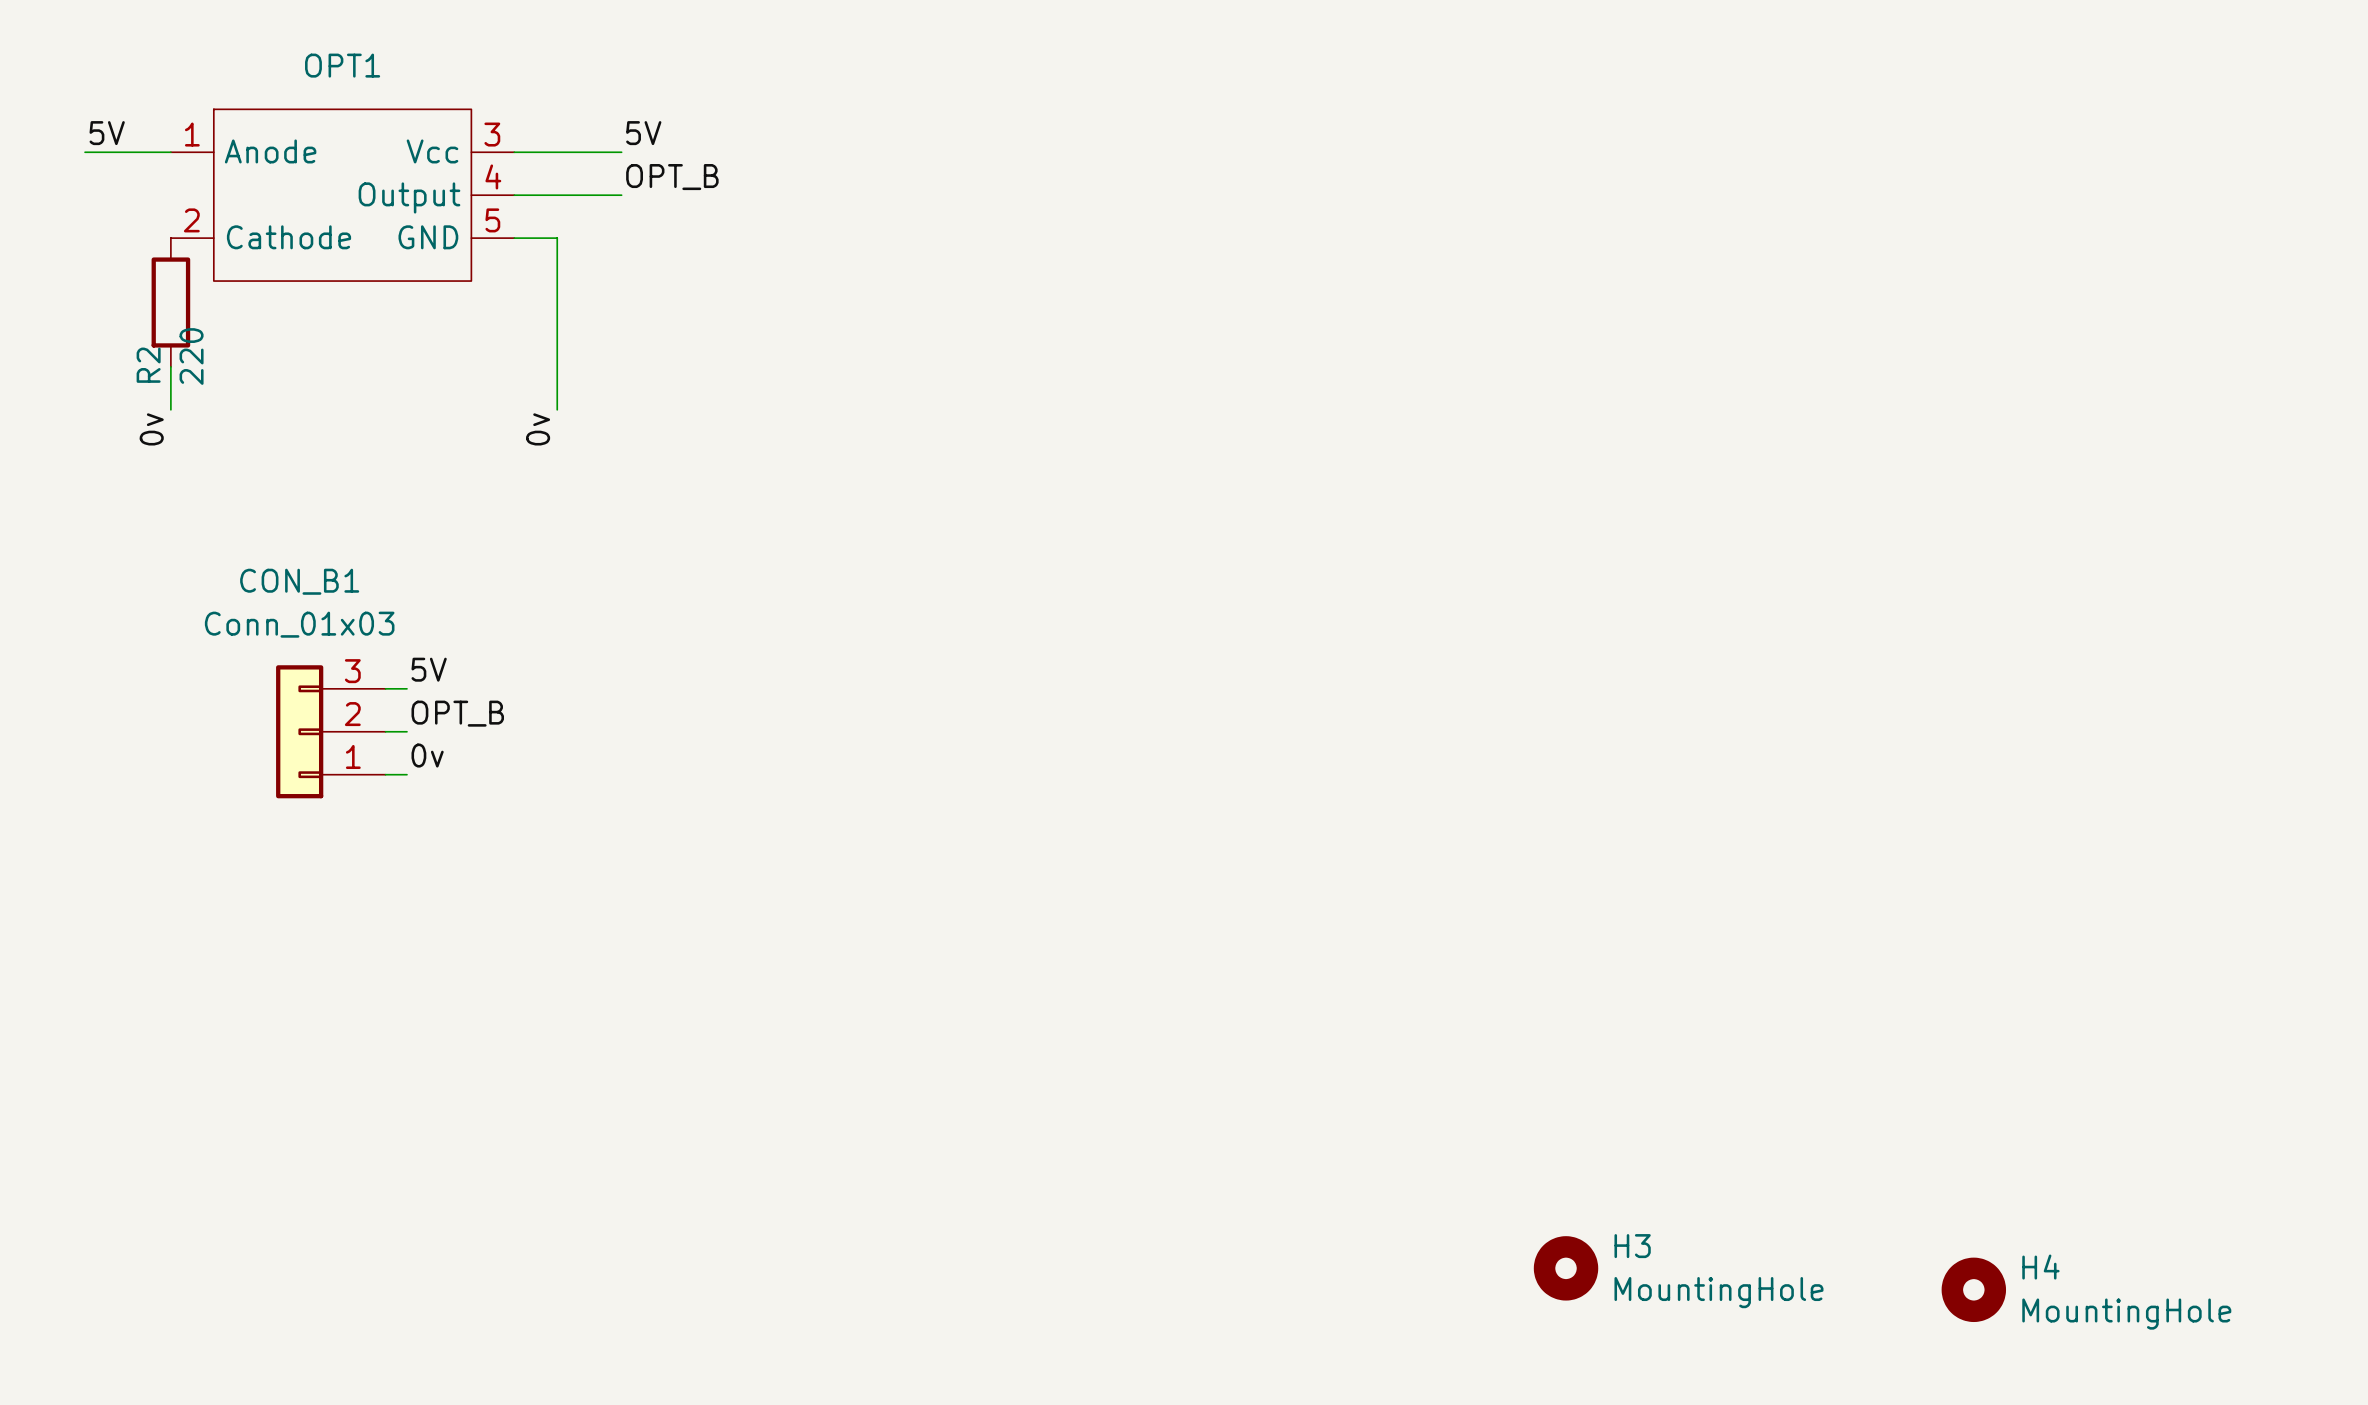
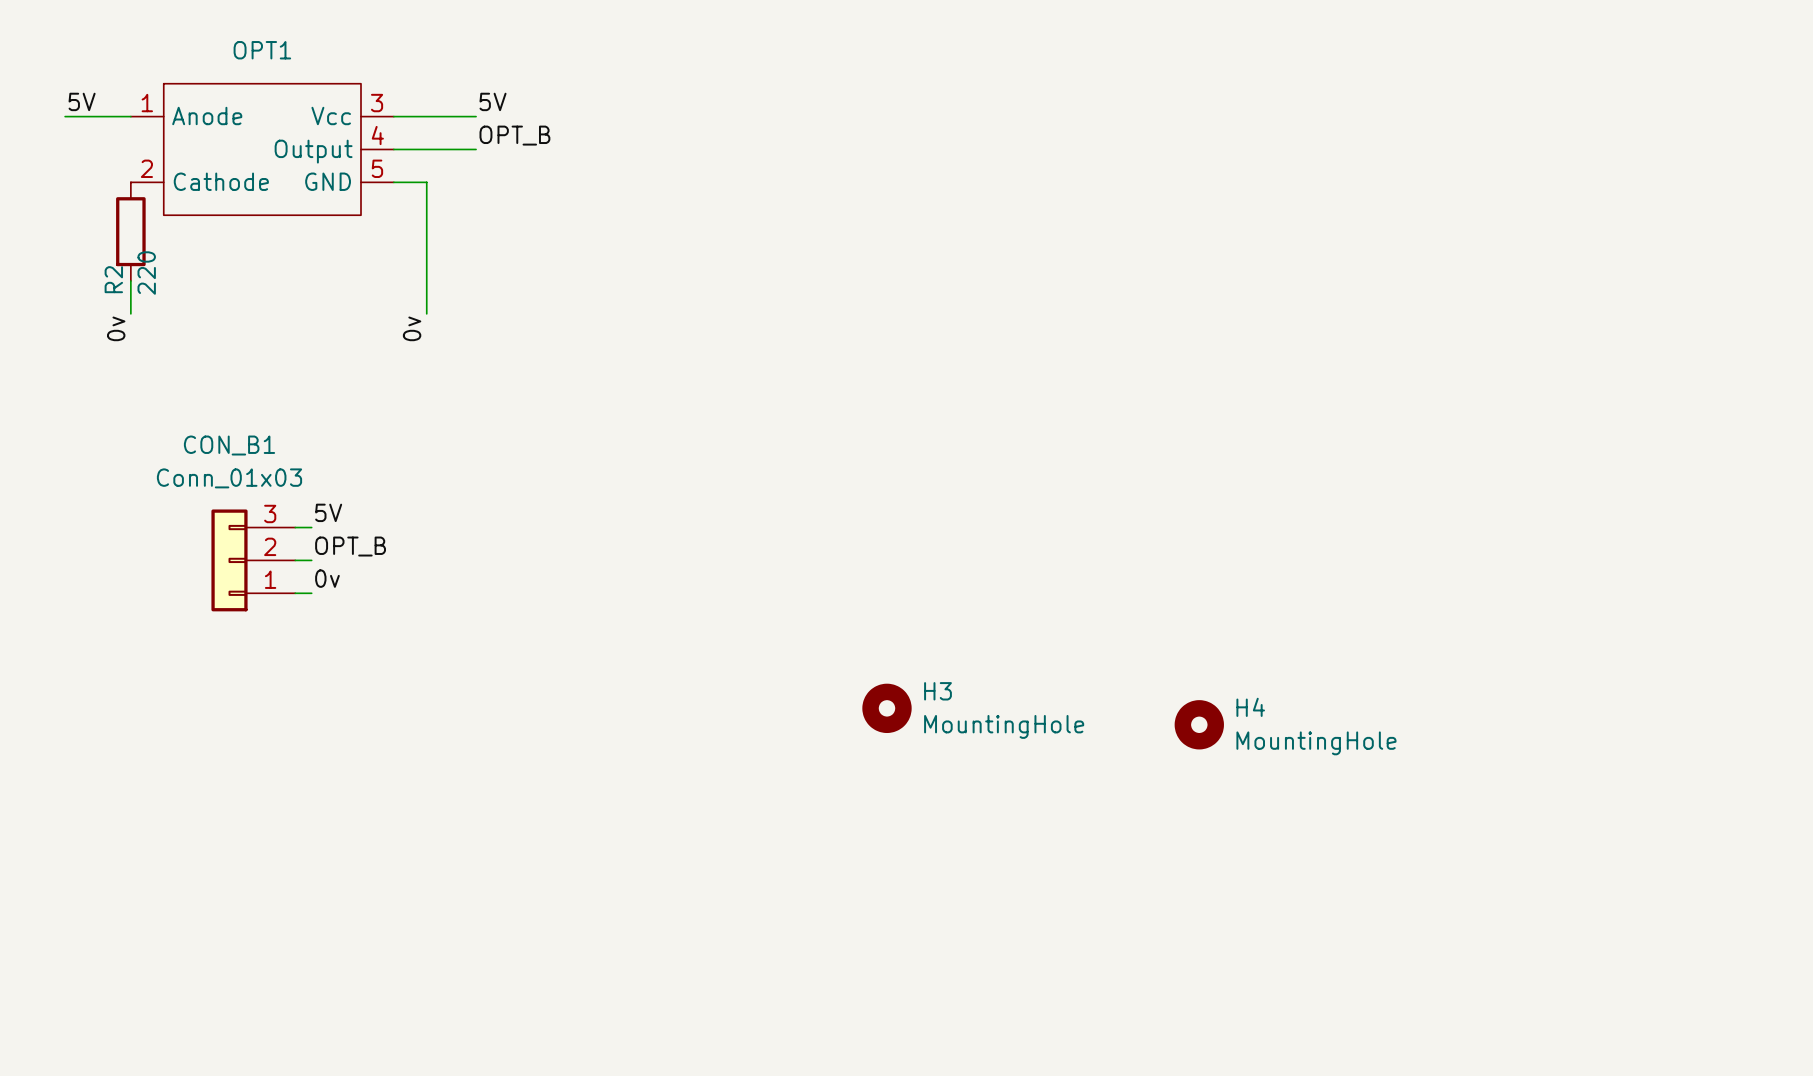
H3 position: (1566, 1268) -> (886, 708)
H4 position: (1973, 1289) -> (1199, 724)

